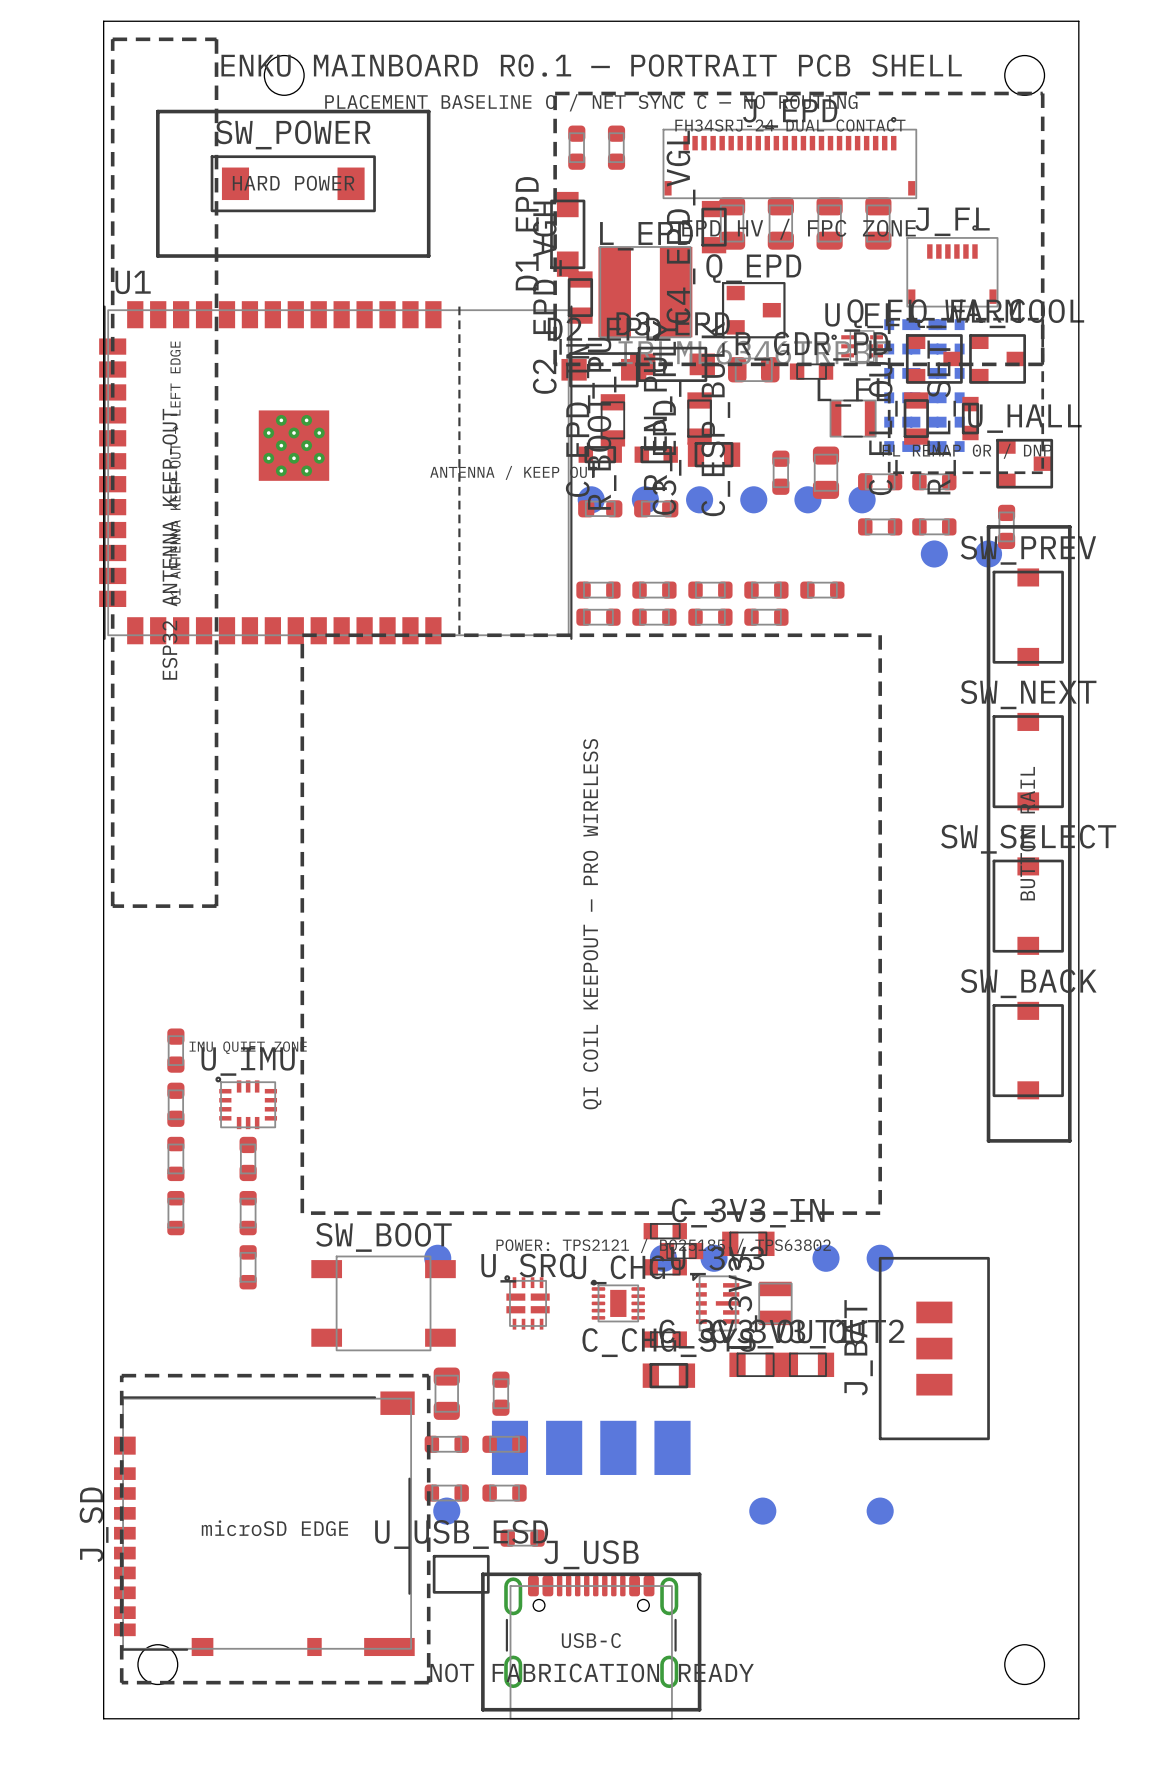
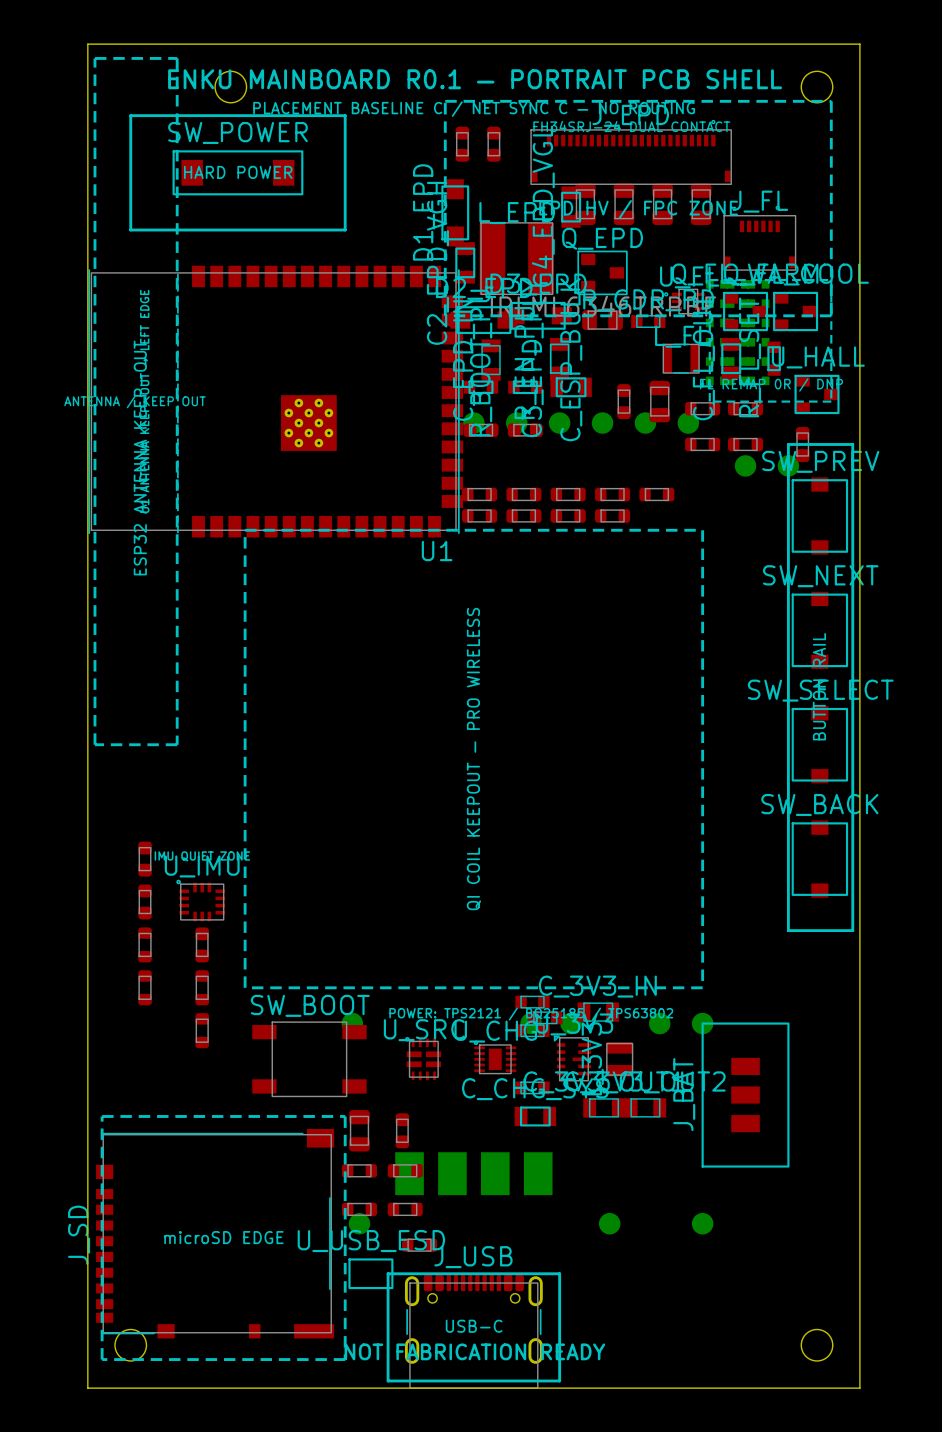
U1 rotation: 0° (335, 472) -> 180° (275, 401)

